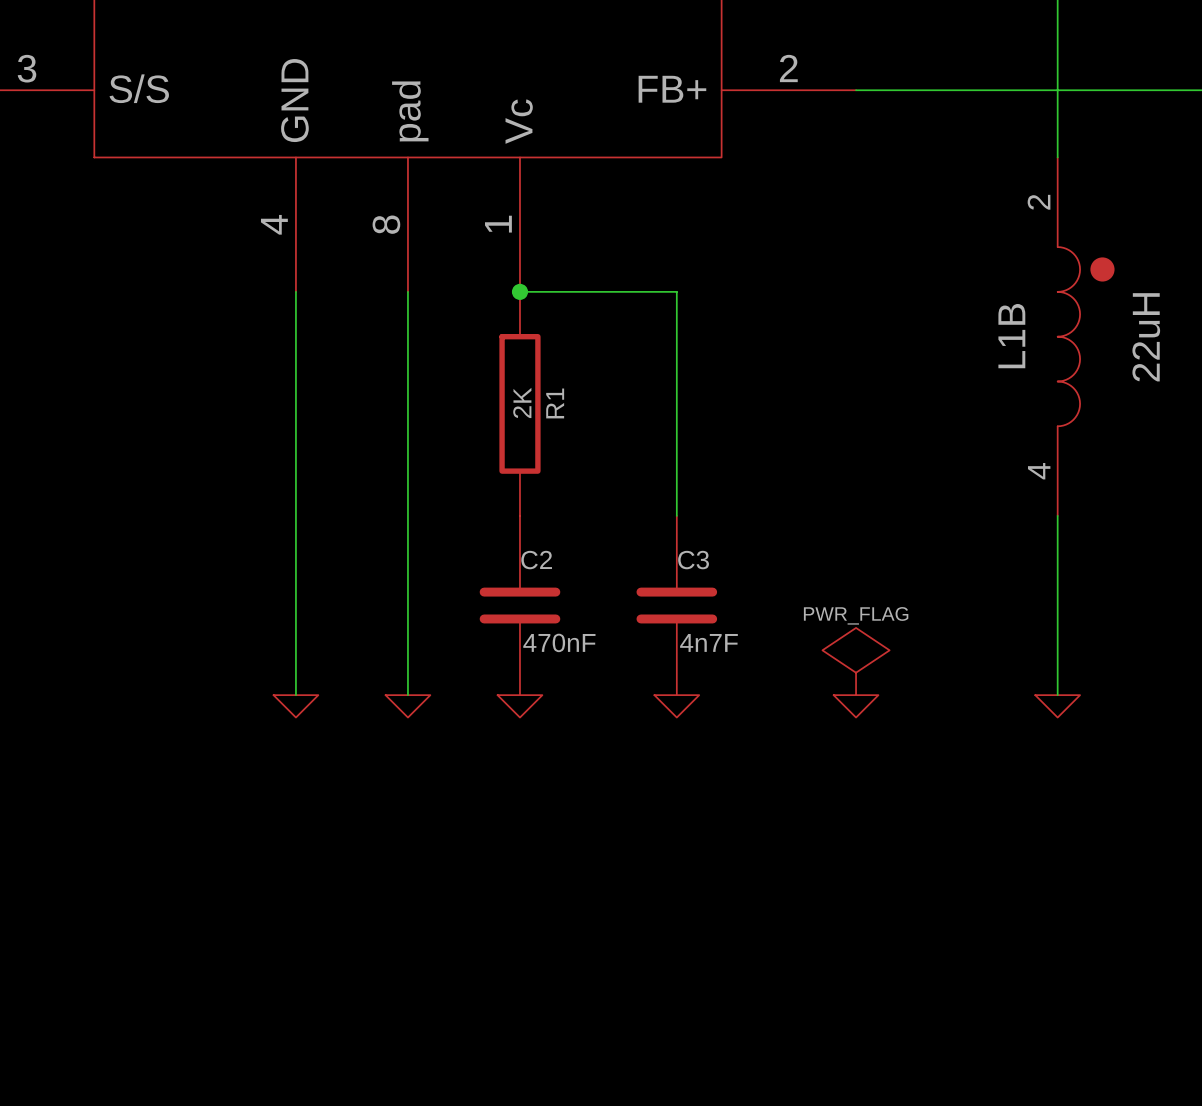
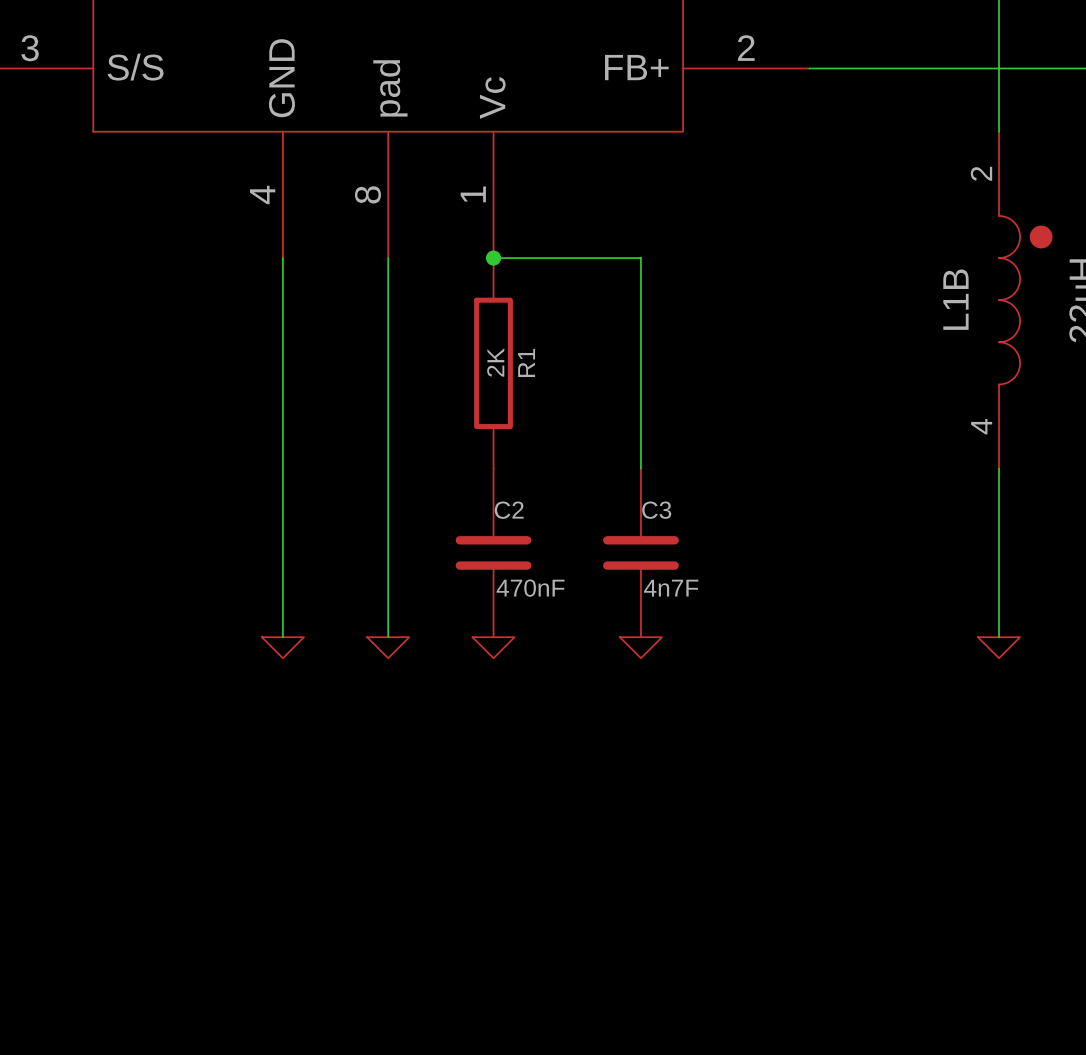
power symbol: PWR_FLAG (856, 661) -> none
power symbol: (856, 706) -> none

